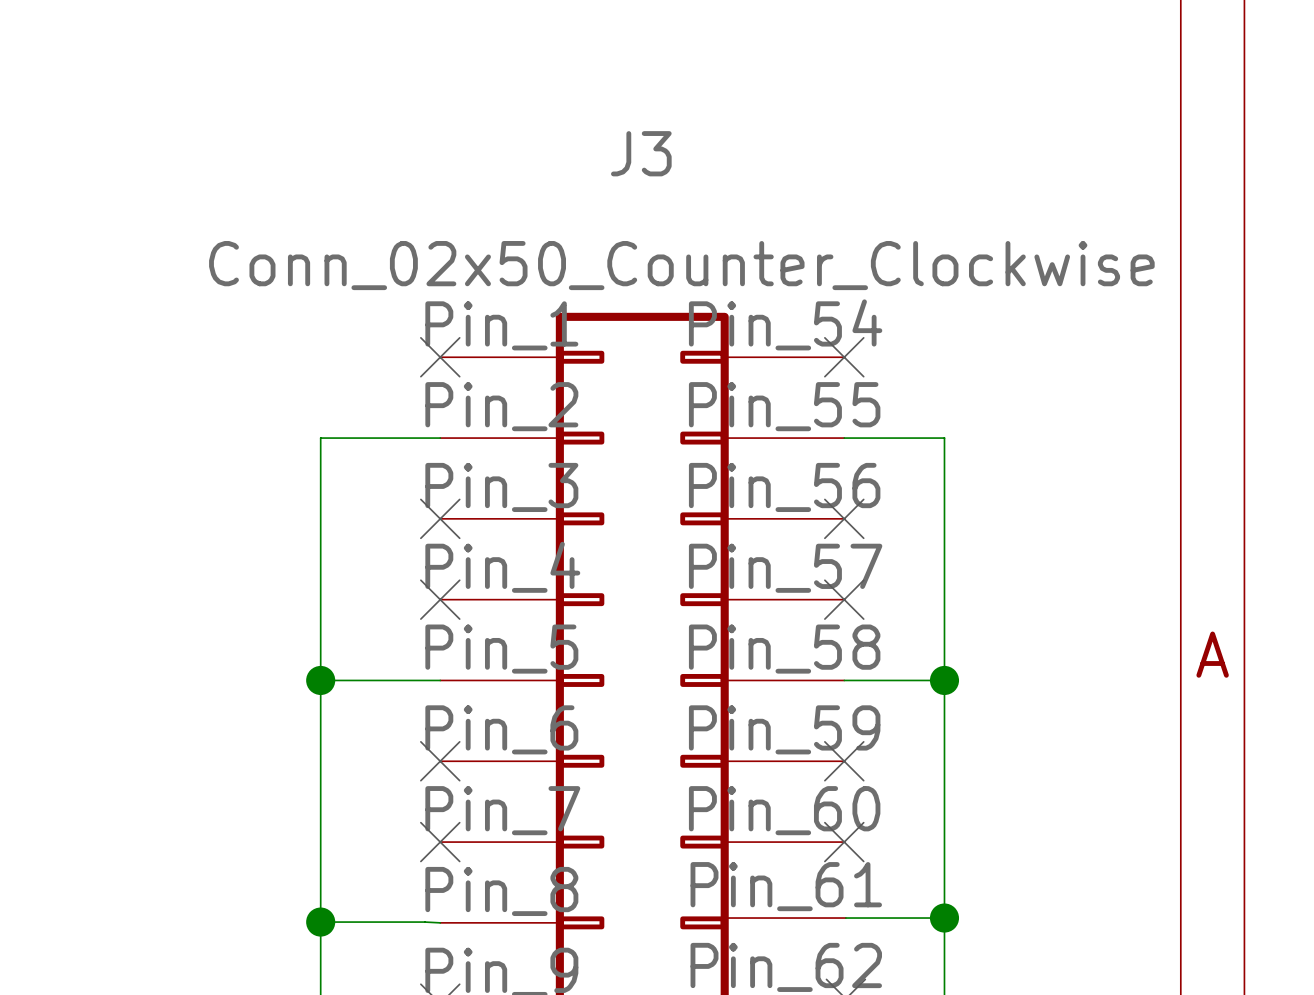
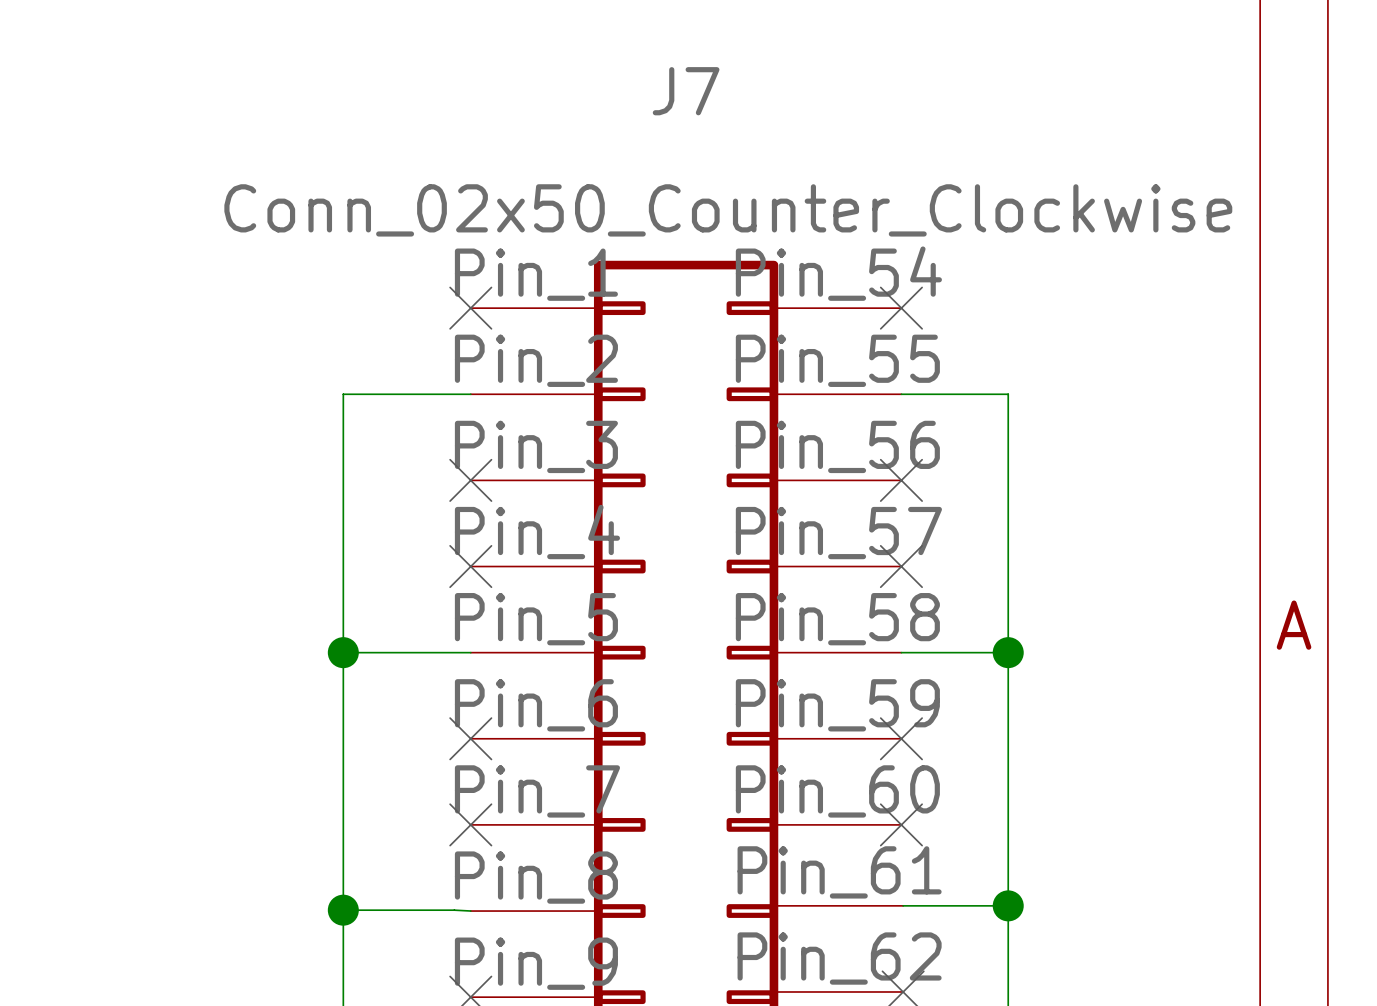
J3 name: J3 (641, 153) -> J7 (686, 91)

